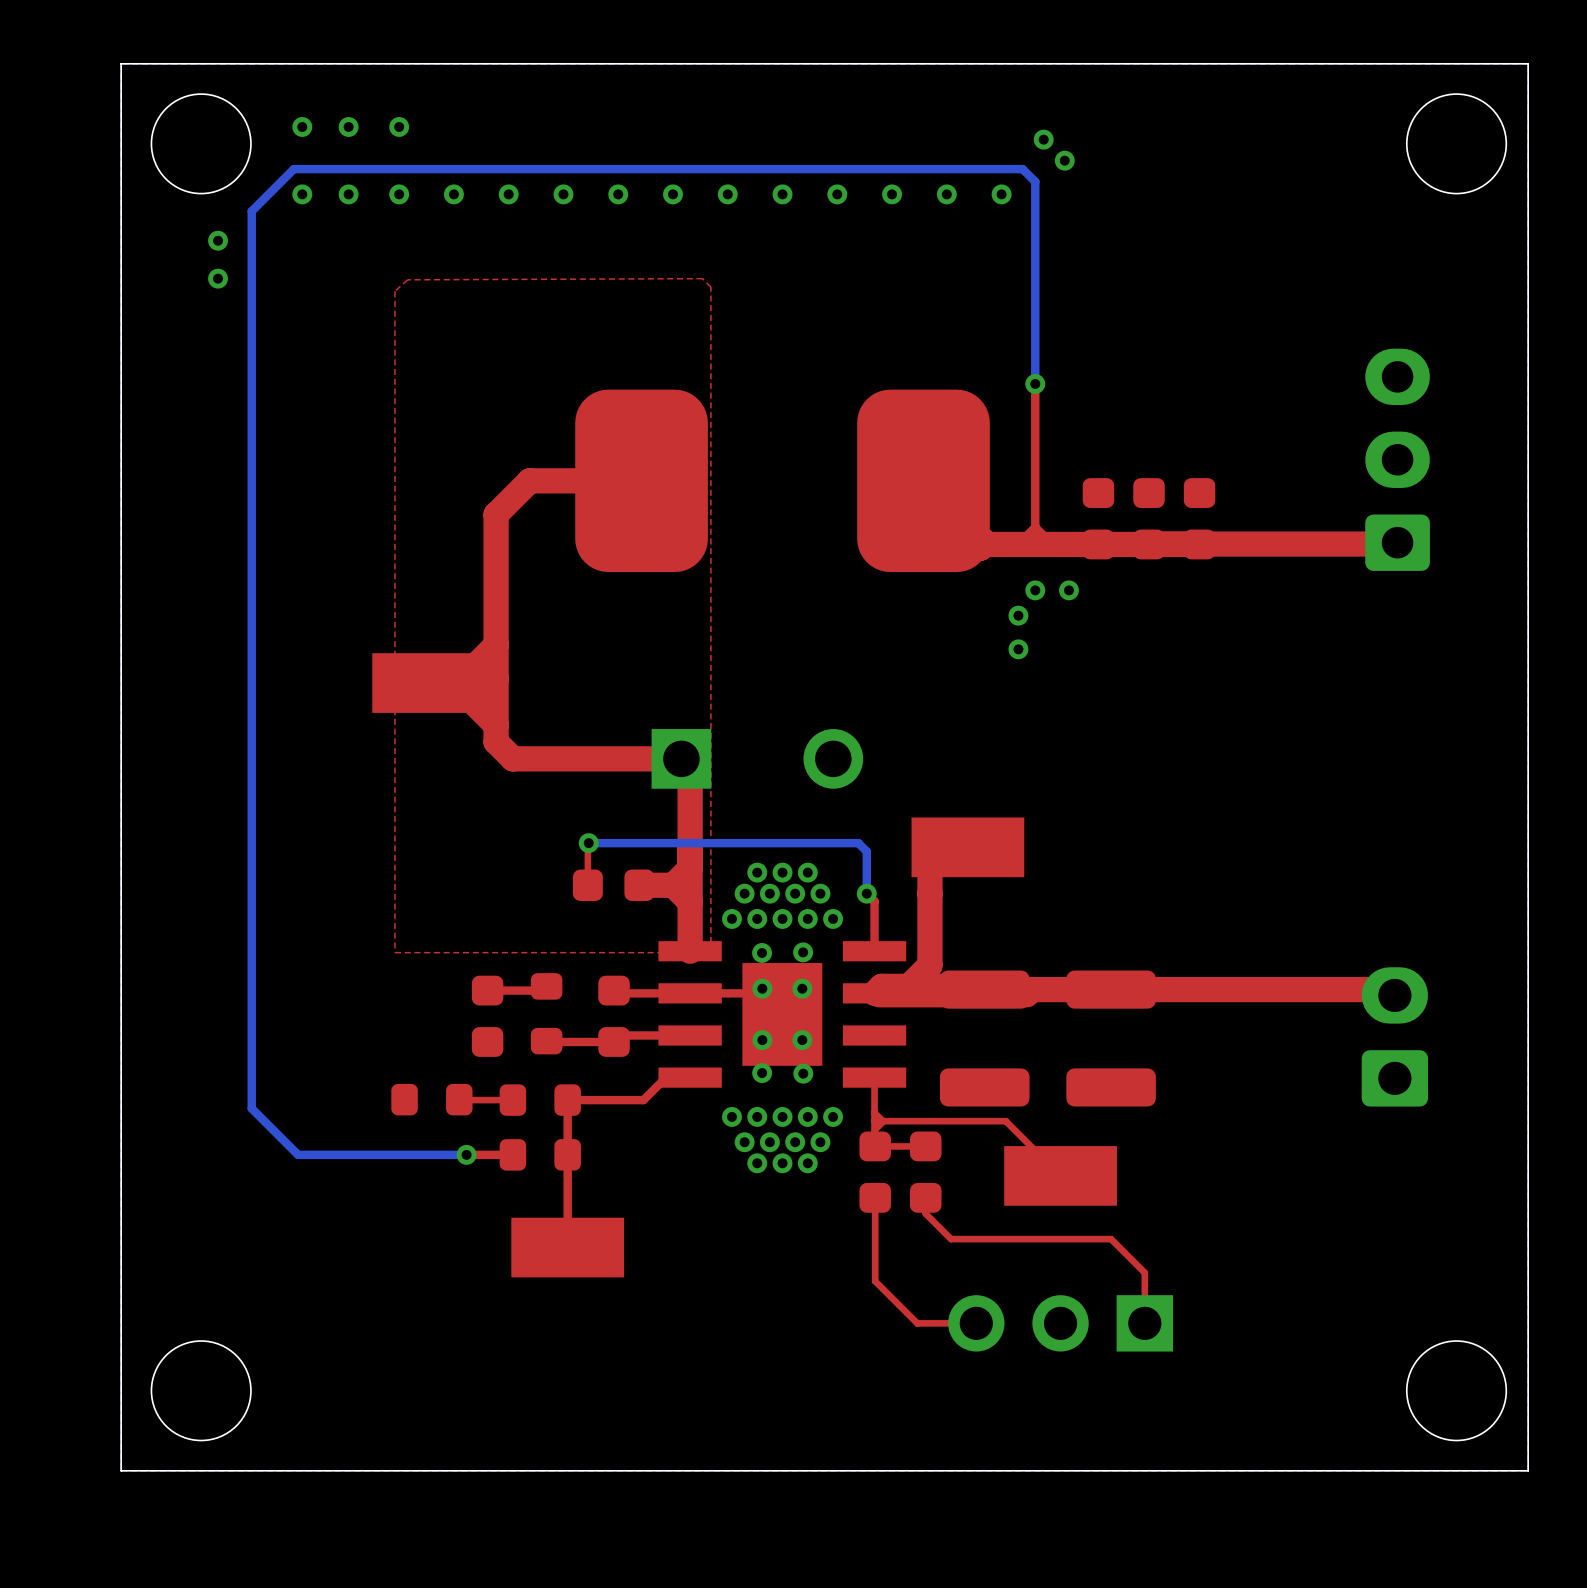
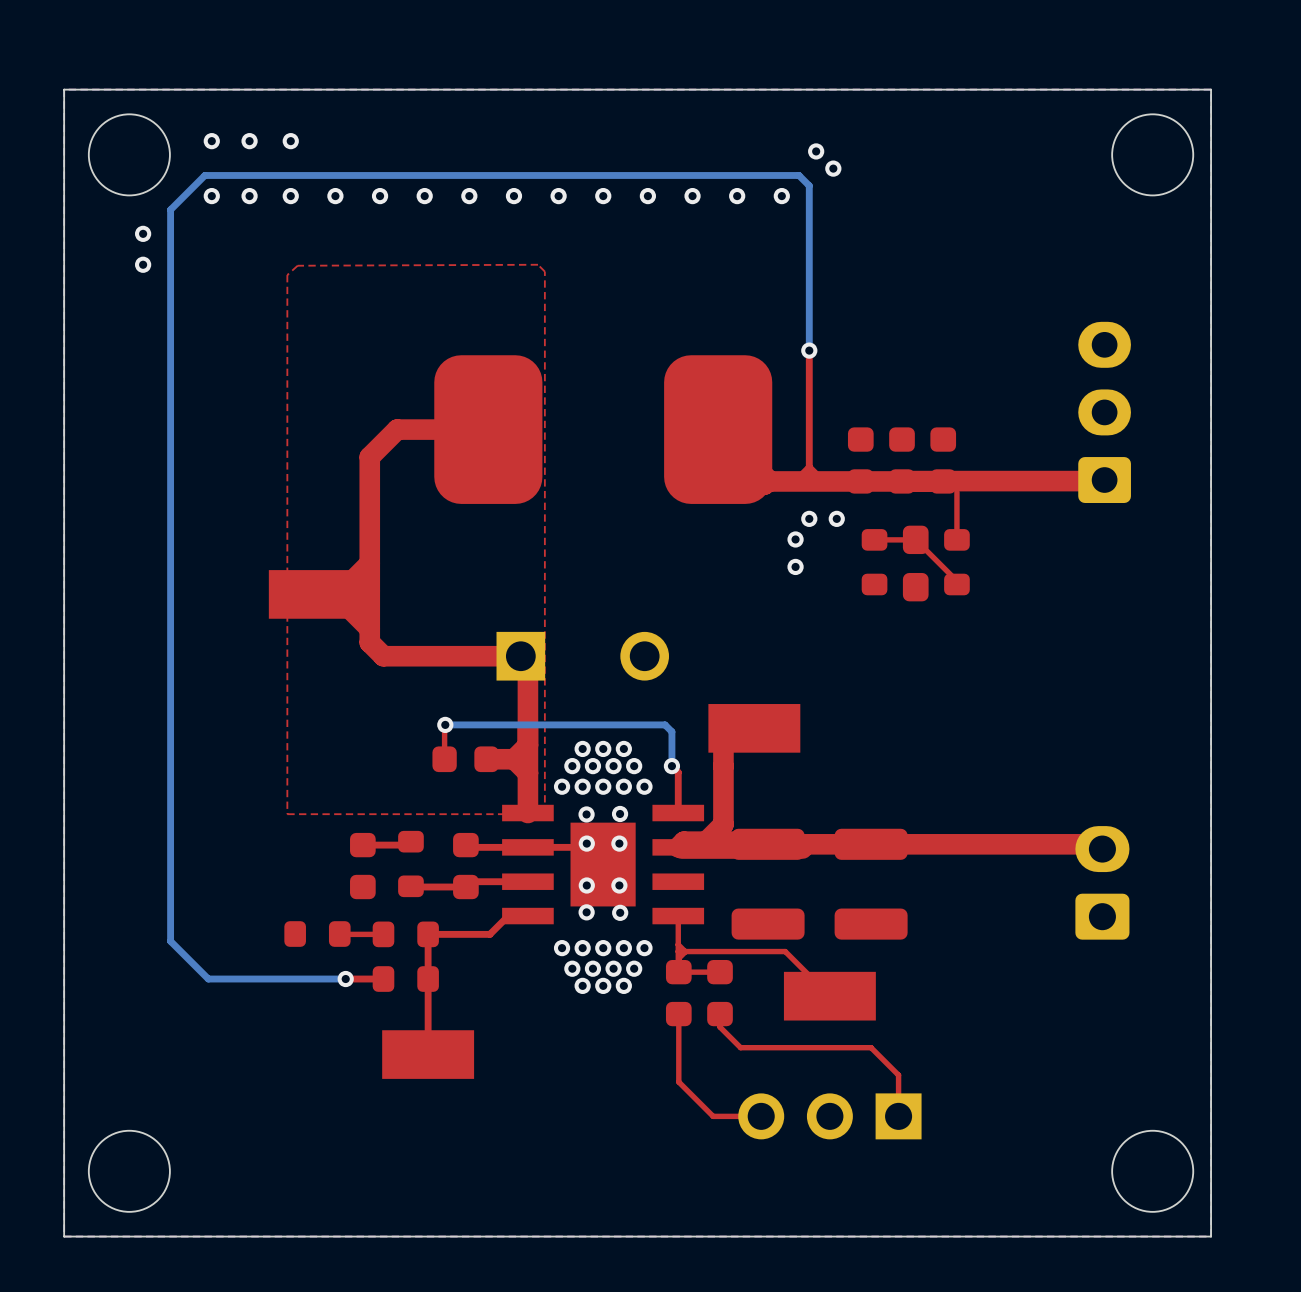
top track: none -> (956, 492) (956, 539)
top track: none -> (874, 539) (915, 539) (956, 581) (956, 584)
part: none -> (874, 562)
part: none -> (956, 562)
part: none -> (915, 563)

